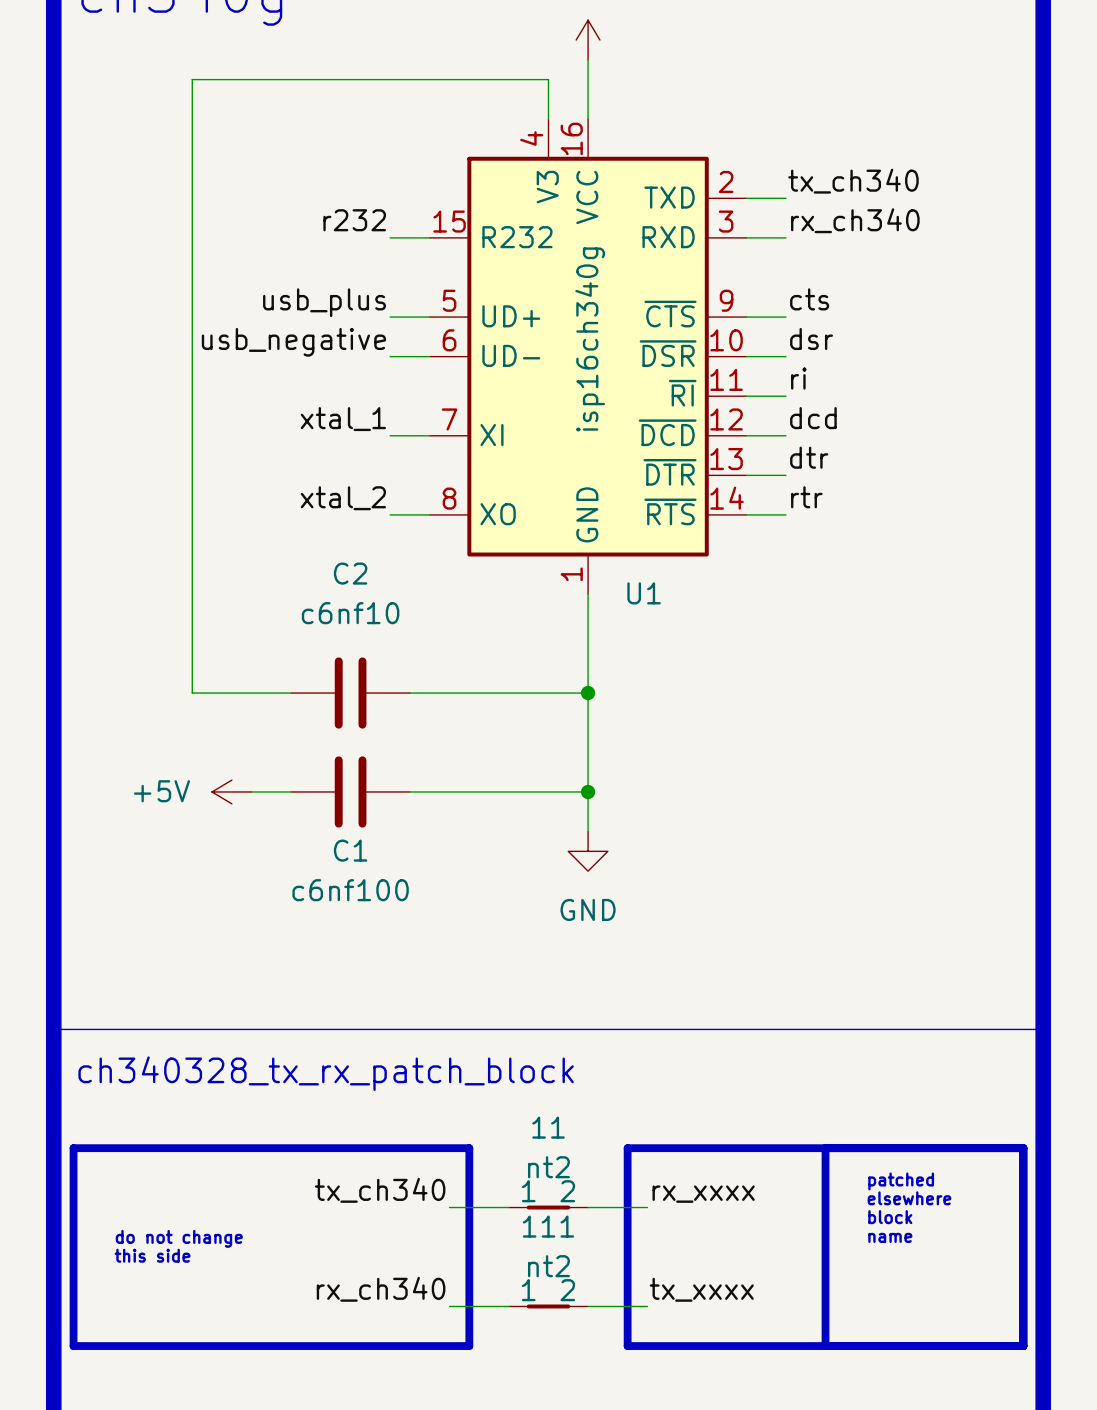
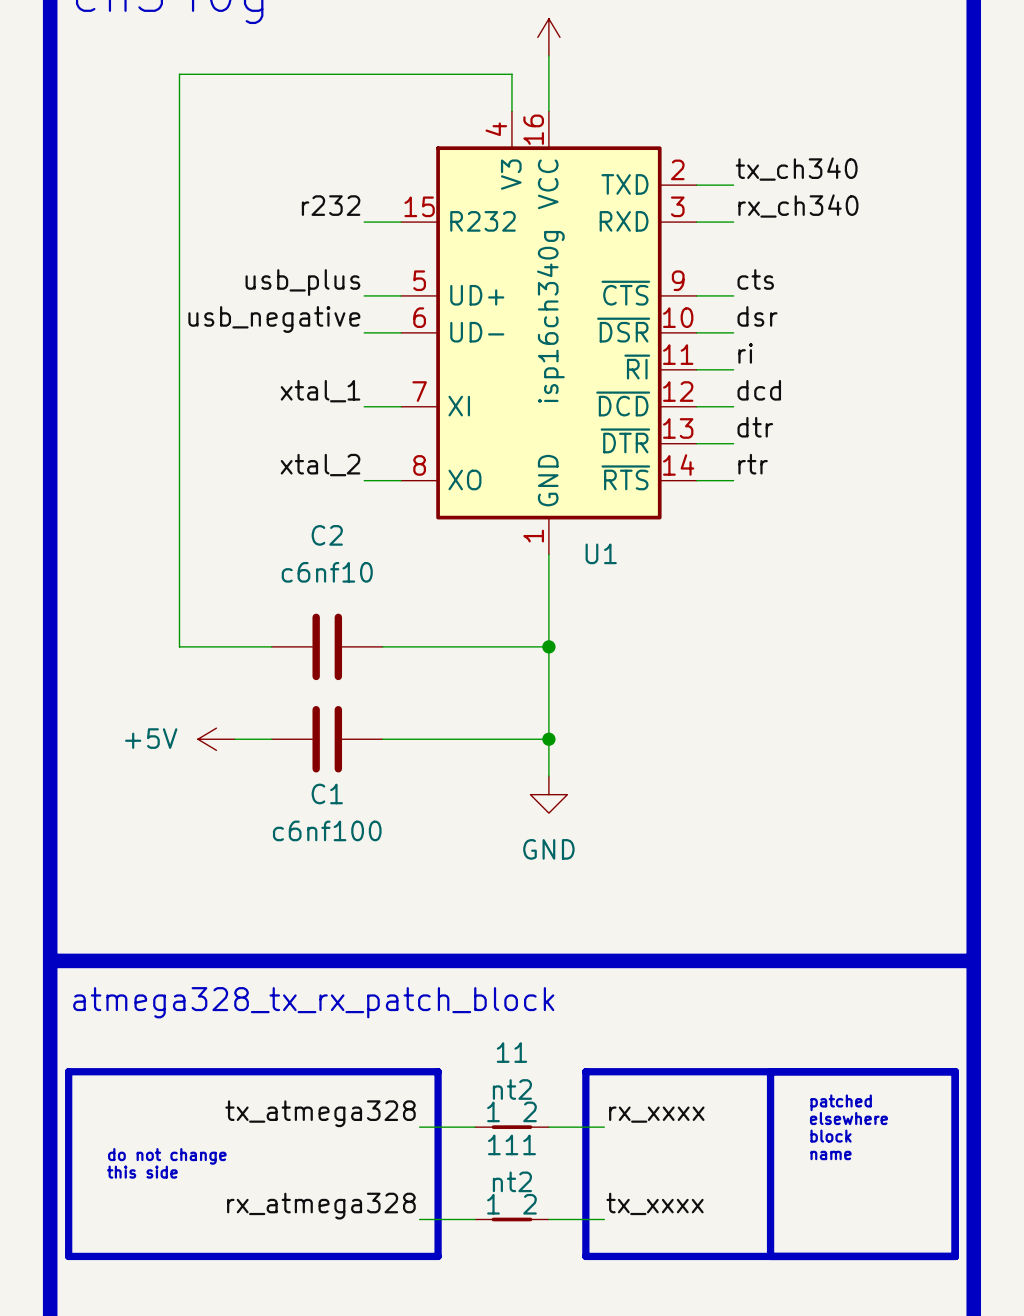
line width: thin (53, 1029) (1043, 1029) -> thick (50, 960) (973, 960)
text: ch340328_tx_rx_patch_block (326, 1073) -> atmega328_tx_rx_patch_block (313, 1002)
label: tx_ch340 (380, 1190) -> tx_atmega328 (320, 1113)
label: rx_ch340 (381, 1289) -> rx_atmega328 (321, 1206)

